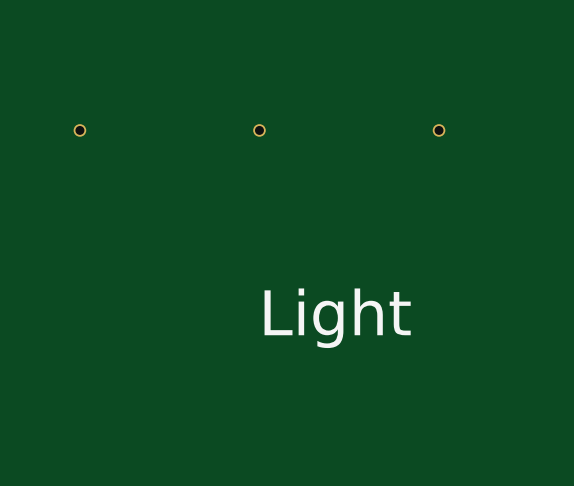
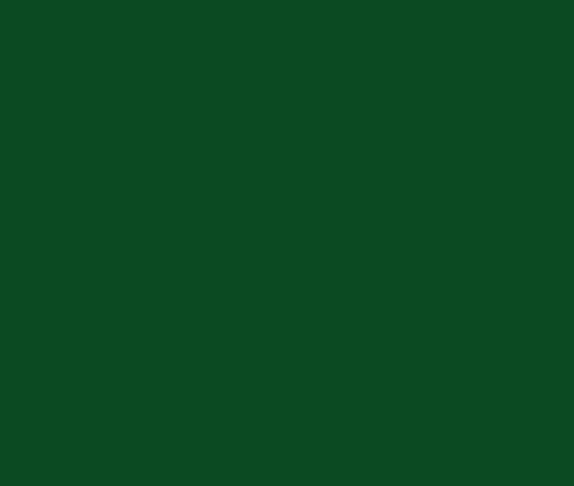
part: (79, 130) -> none
part: (259, 130) -> none
part: (439, 130) -> none
text: Light (337, 318) -> none

